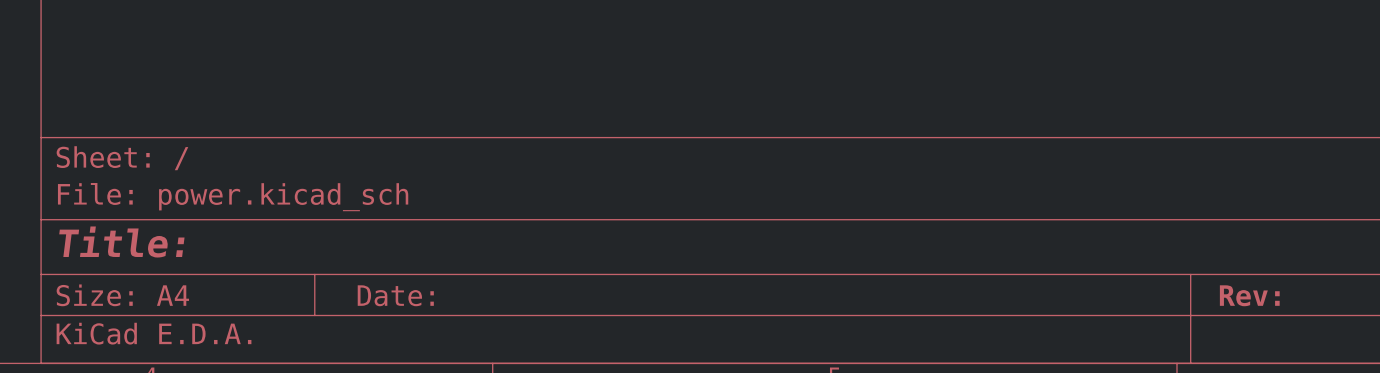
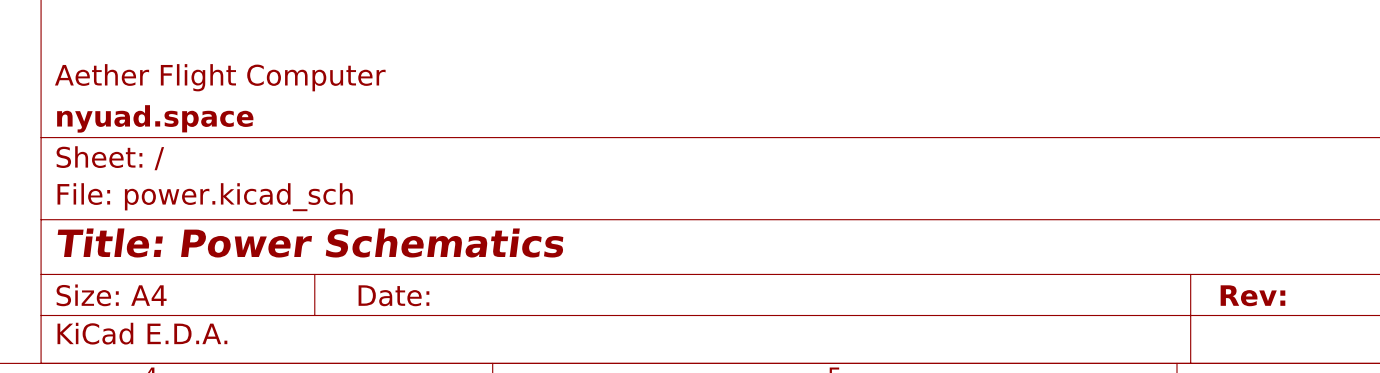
title block: none -> Aether Flight Computer (220, 77)
title block: none -> nyuad.space (155, 118)
title block: Title: (121, 242) -> Title: Power Schematics (310, 243)

